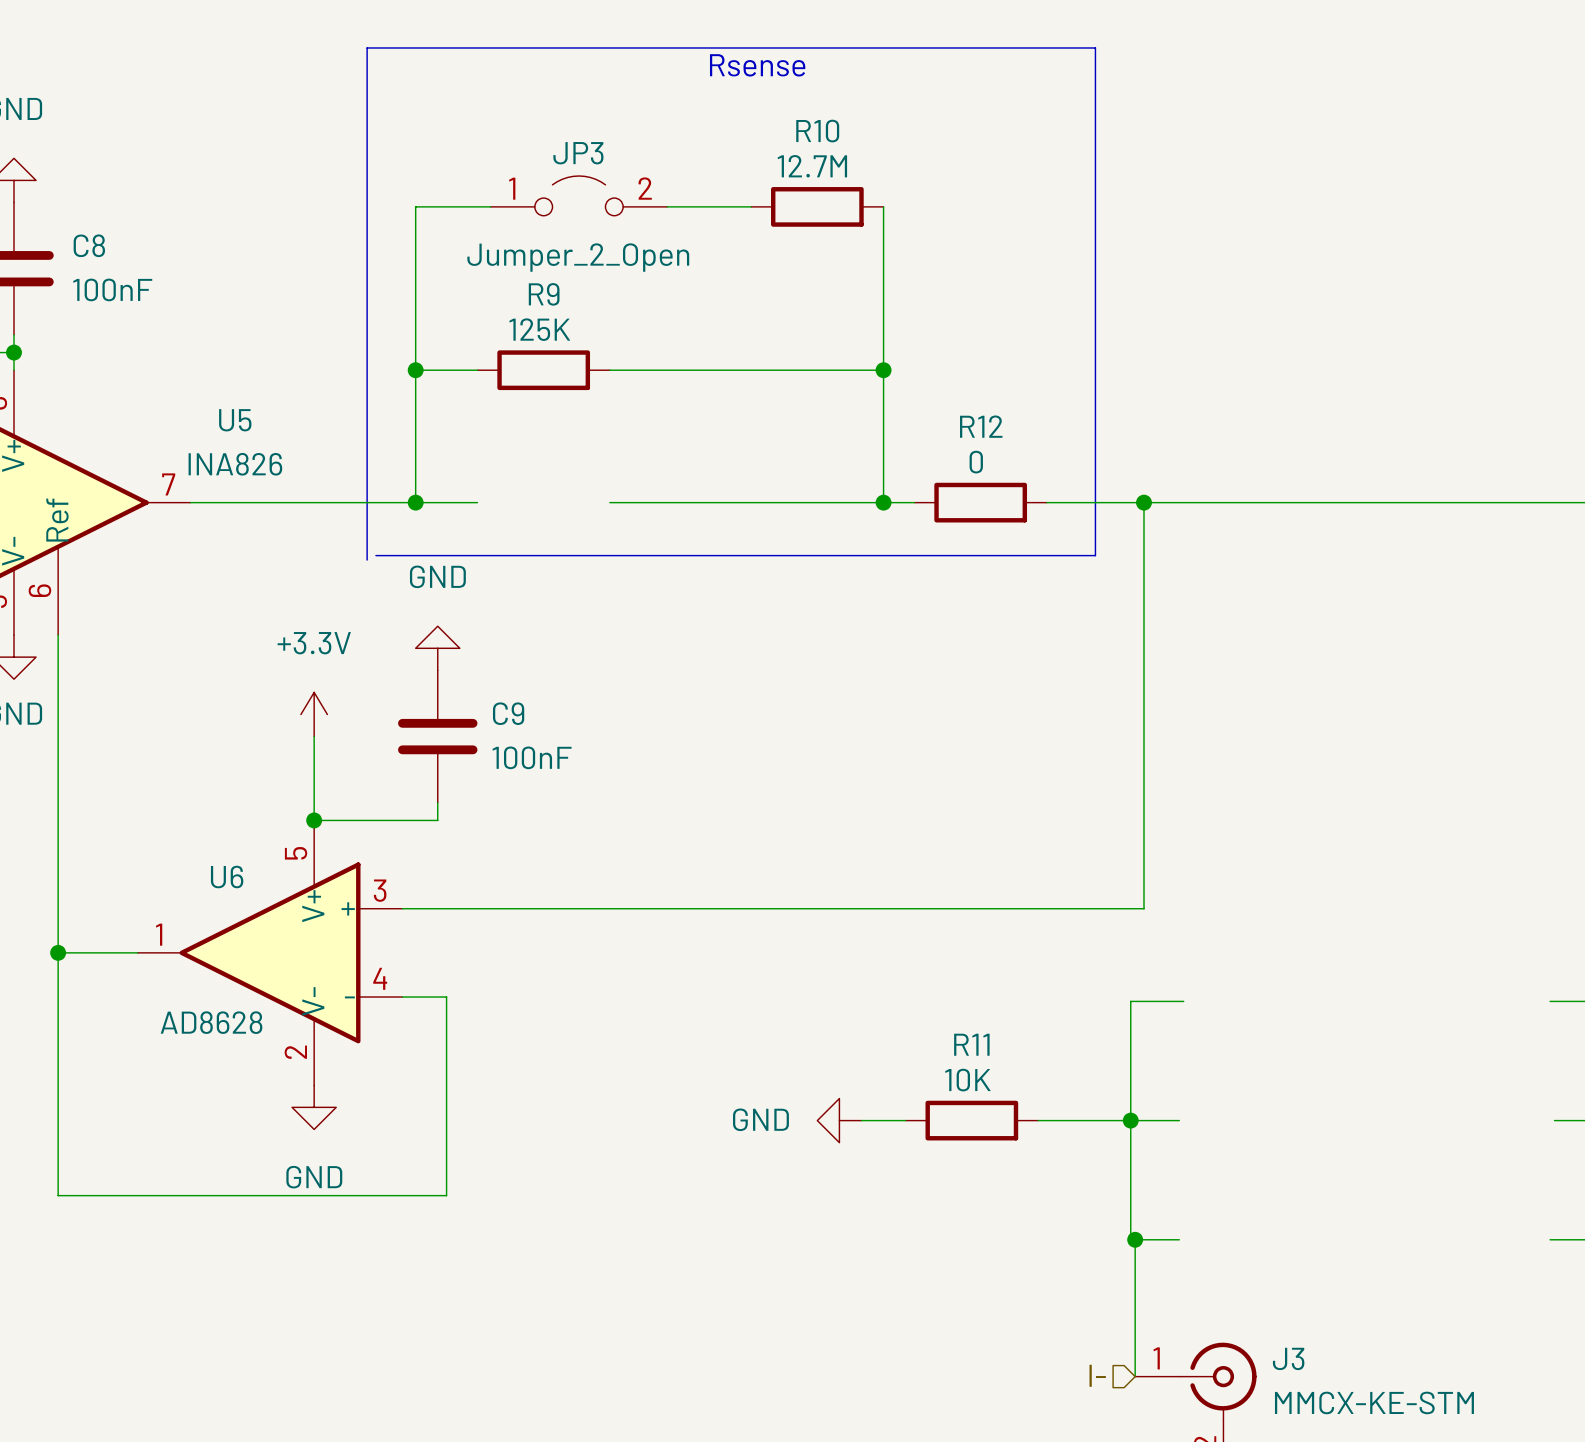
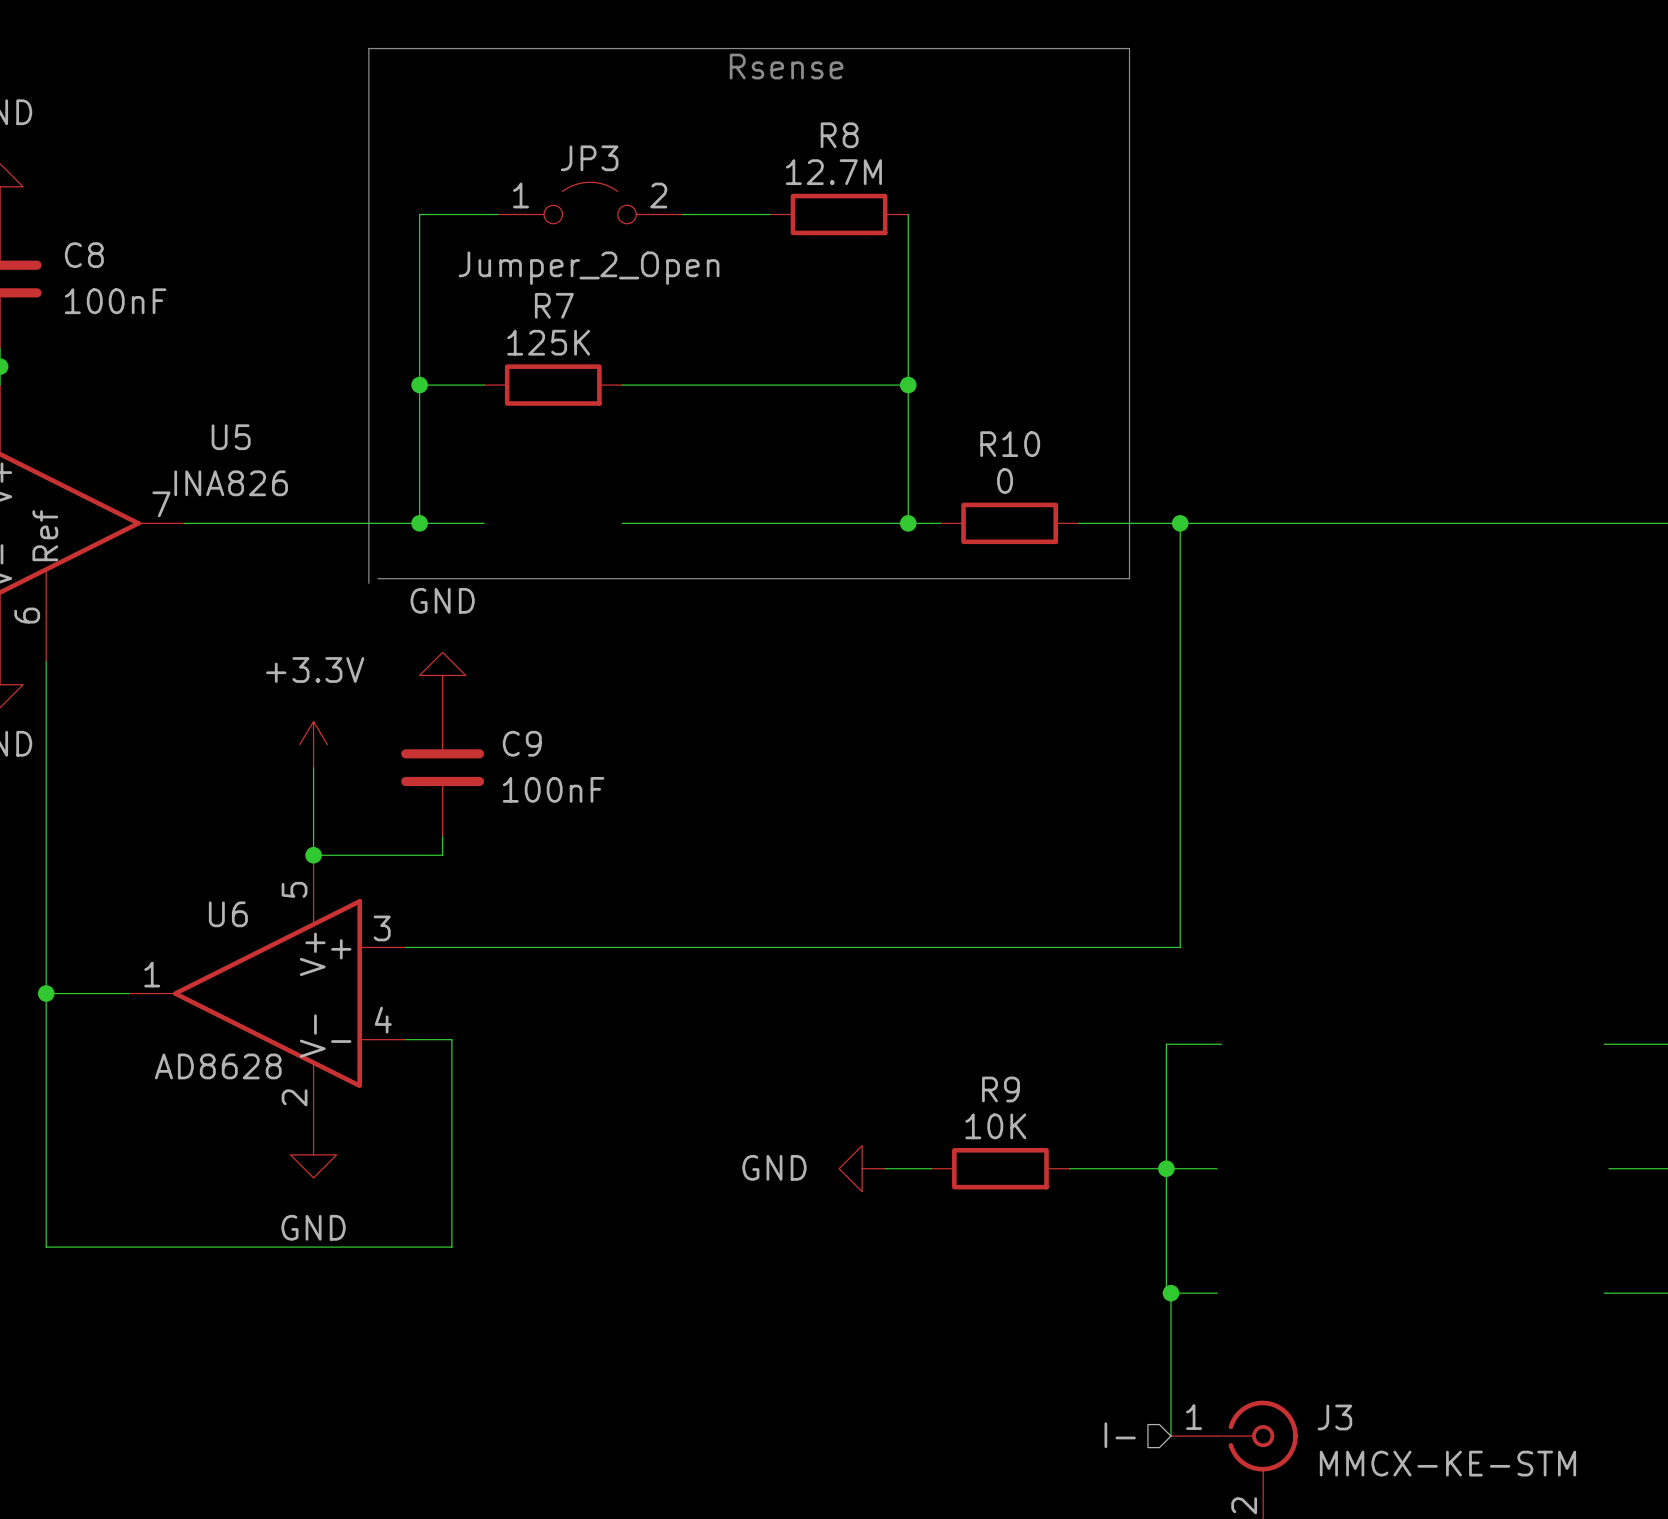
R10 name: R10 (817, 131) -> R8 (839, 135)
R9 name: R9 (544, 294) -> R7 (554, 305)
R12 name: R12 (981, 426) -> R10 (1010, 444)
R11 name: R11 (971, 1044) -> R9 (1000, 1089)

